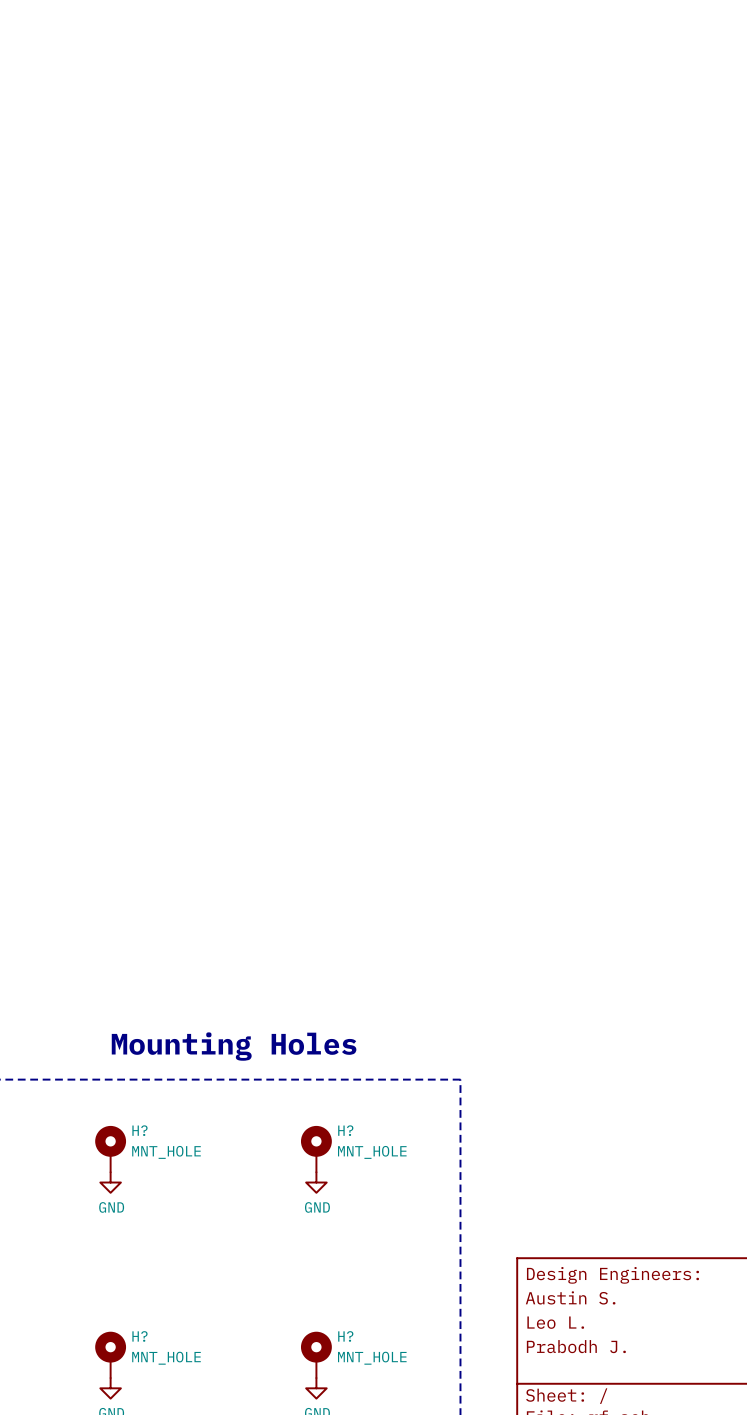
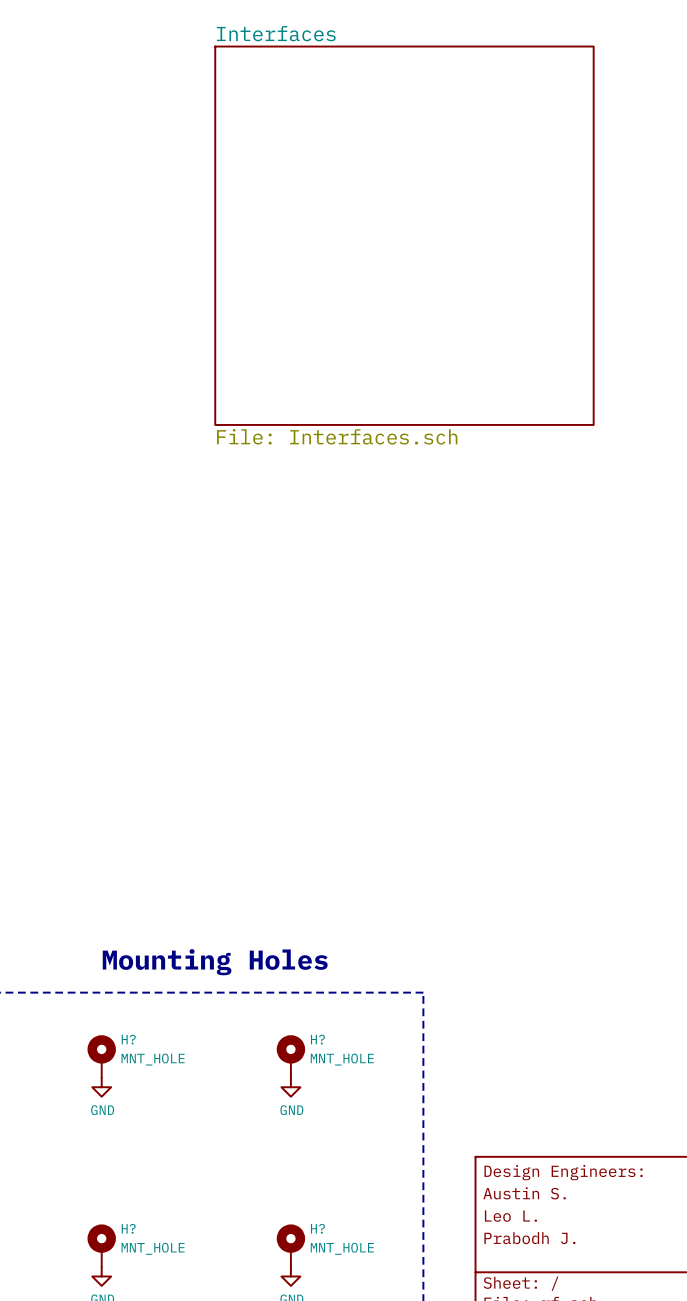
sheet Interfaces: none -> File: Interfaces.sch (404, 235)

